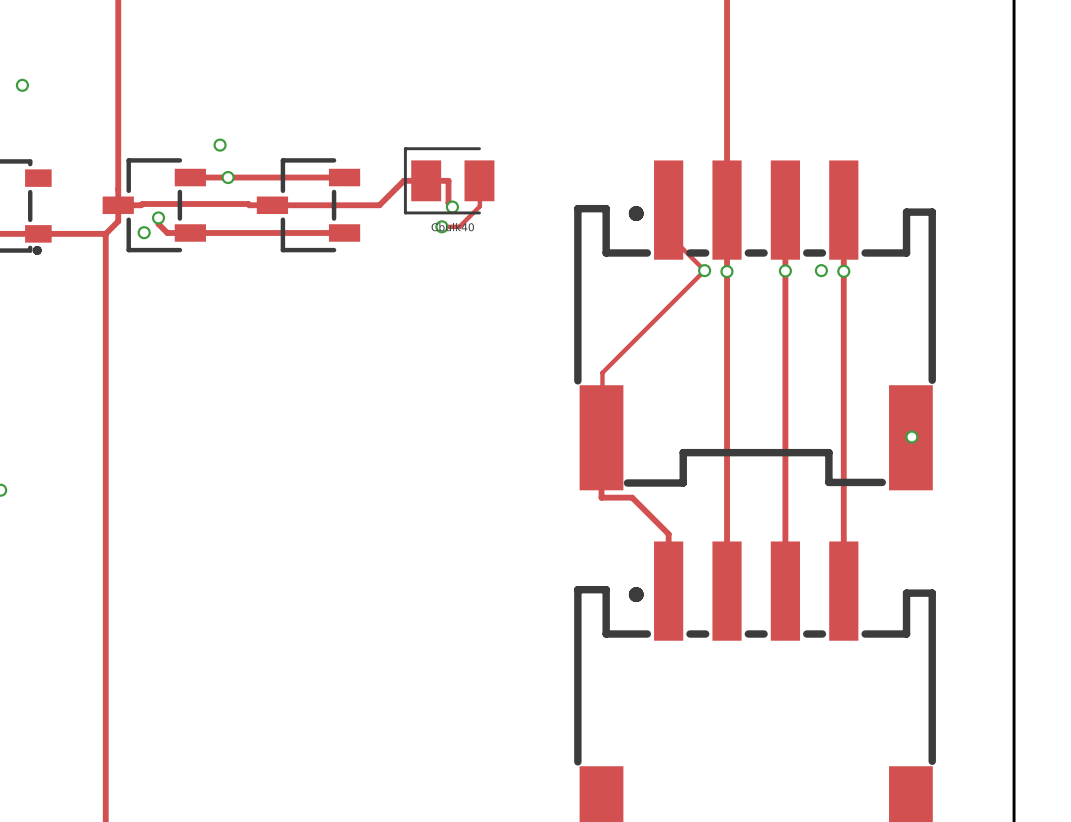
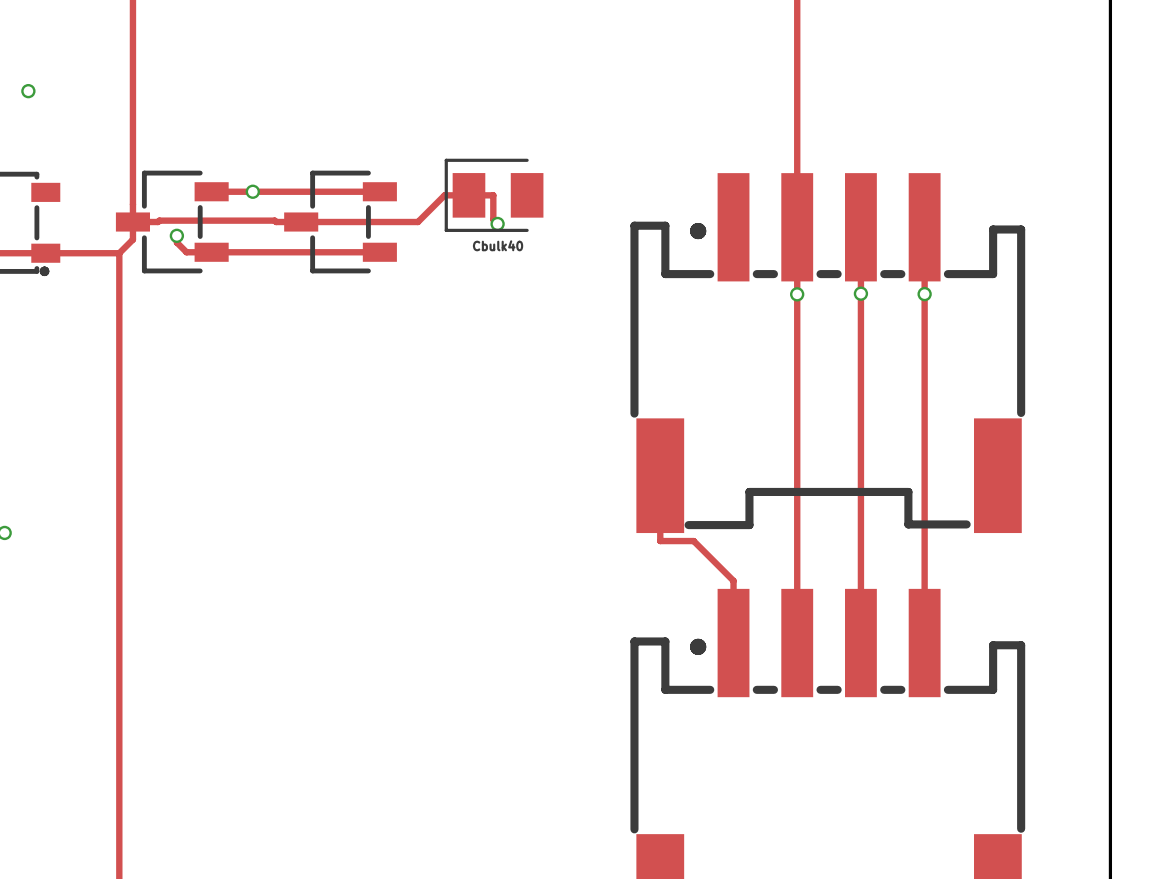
via: (220, 145) -> none
track: (479, 180) (479, 206) (459, 226) (441, 226) -> none
track: (668, 210) (669, 235) (704, 270) (602, 372) (601, 437) -> none
via: (441, 226) -> none
via: (144, 232) -> none
via: (704, 270) -> none
via: (821, 270) -> none
via: (911, 437) -> none

